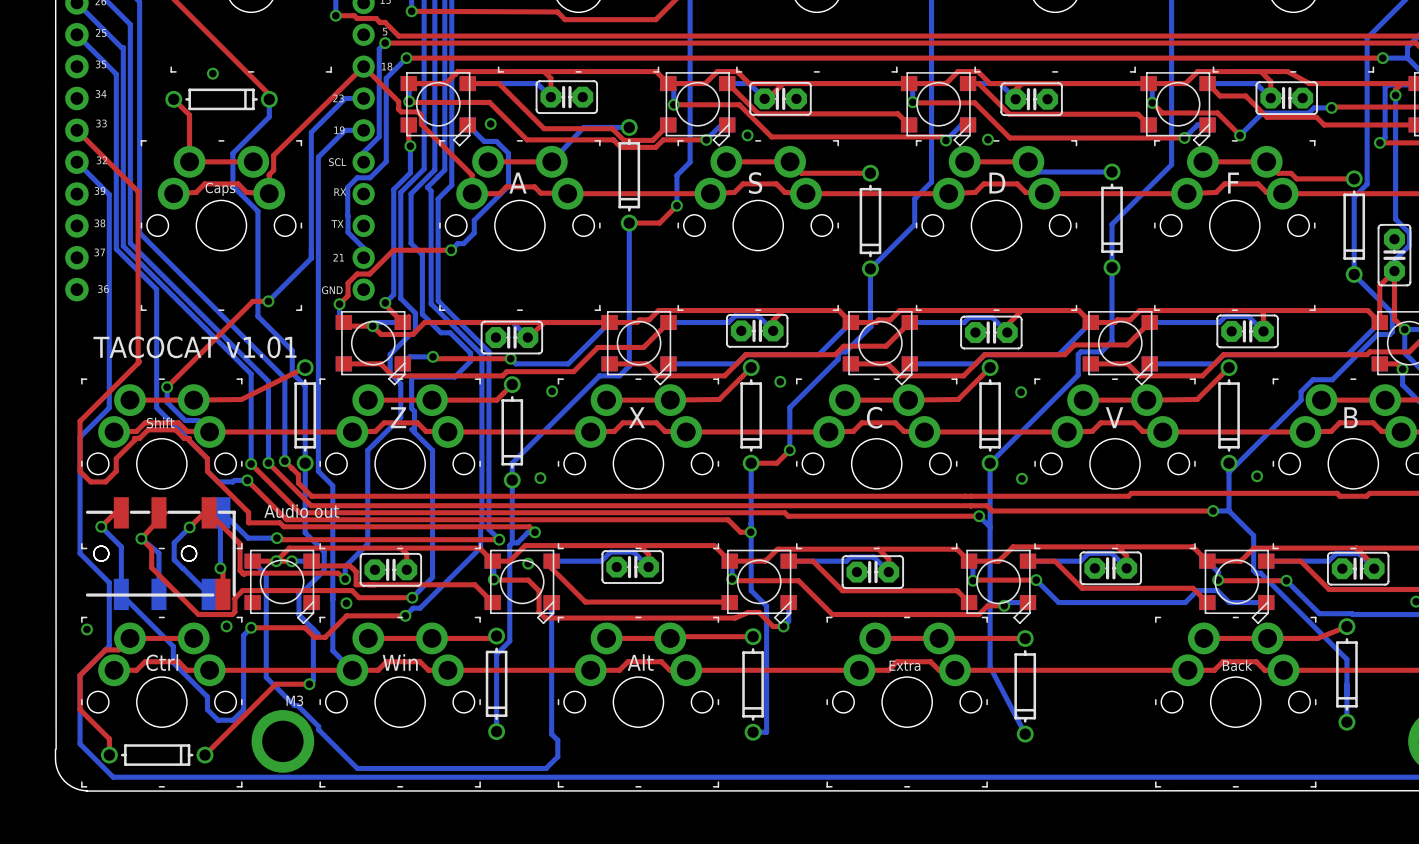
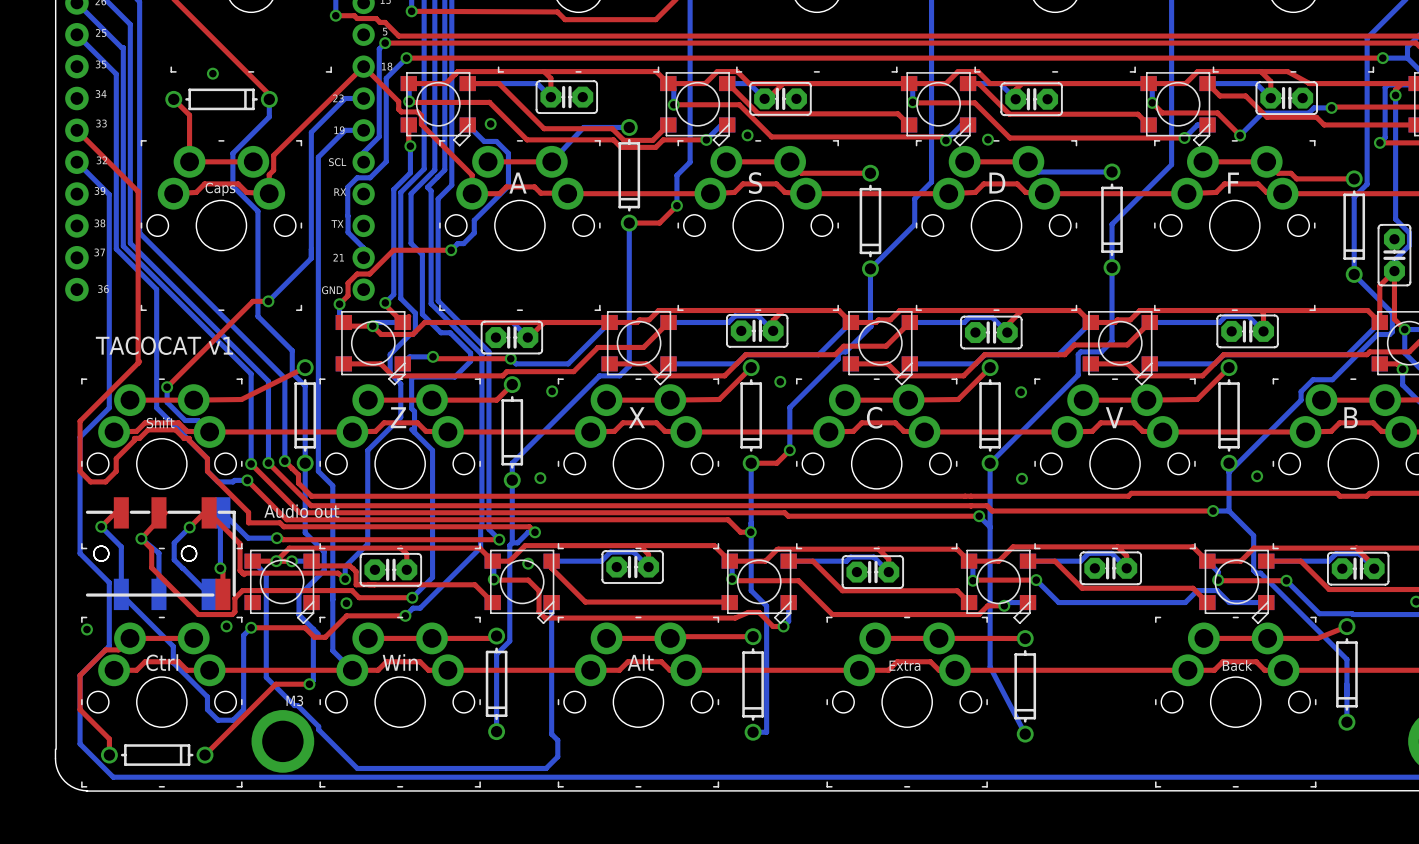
text: TACOCAT v1.01 (194, 347) -> TACOCAT v1 (164, 345)

